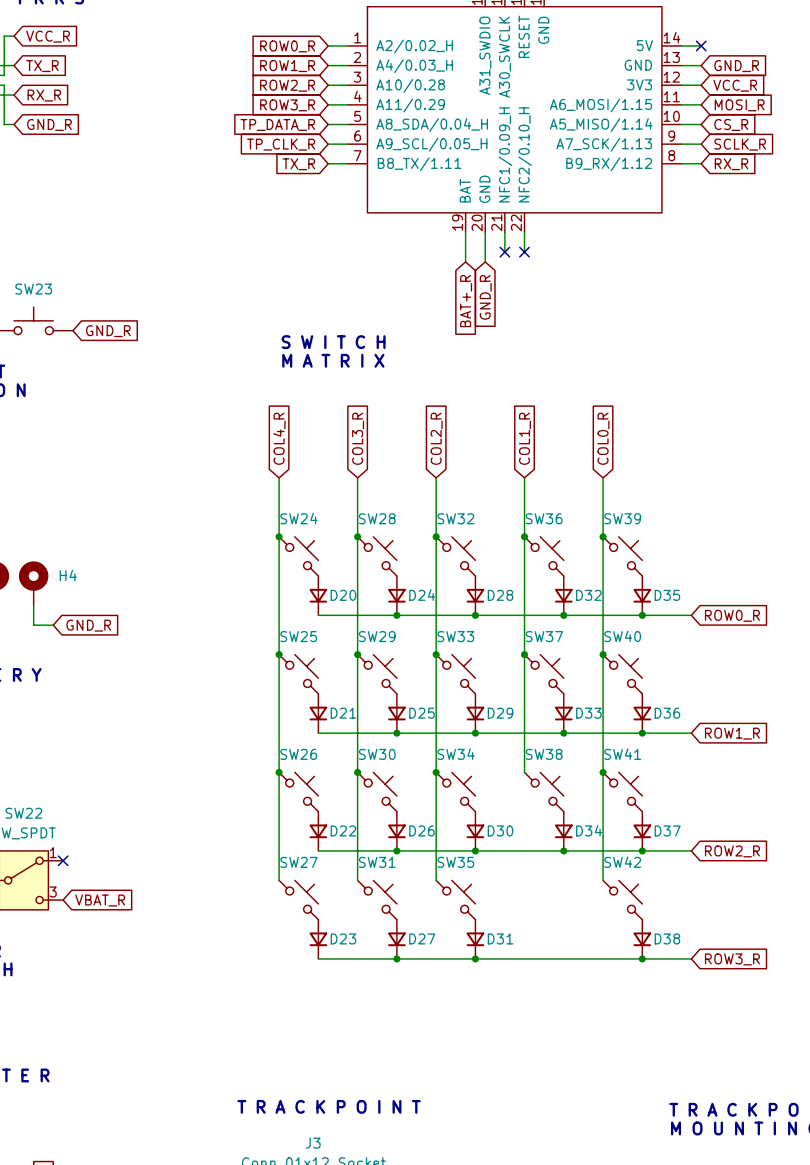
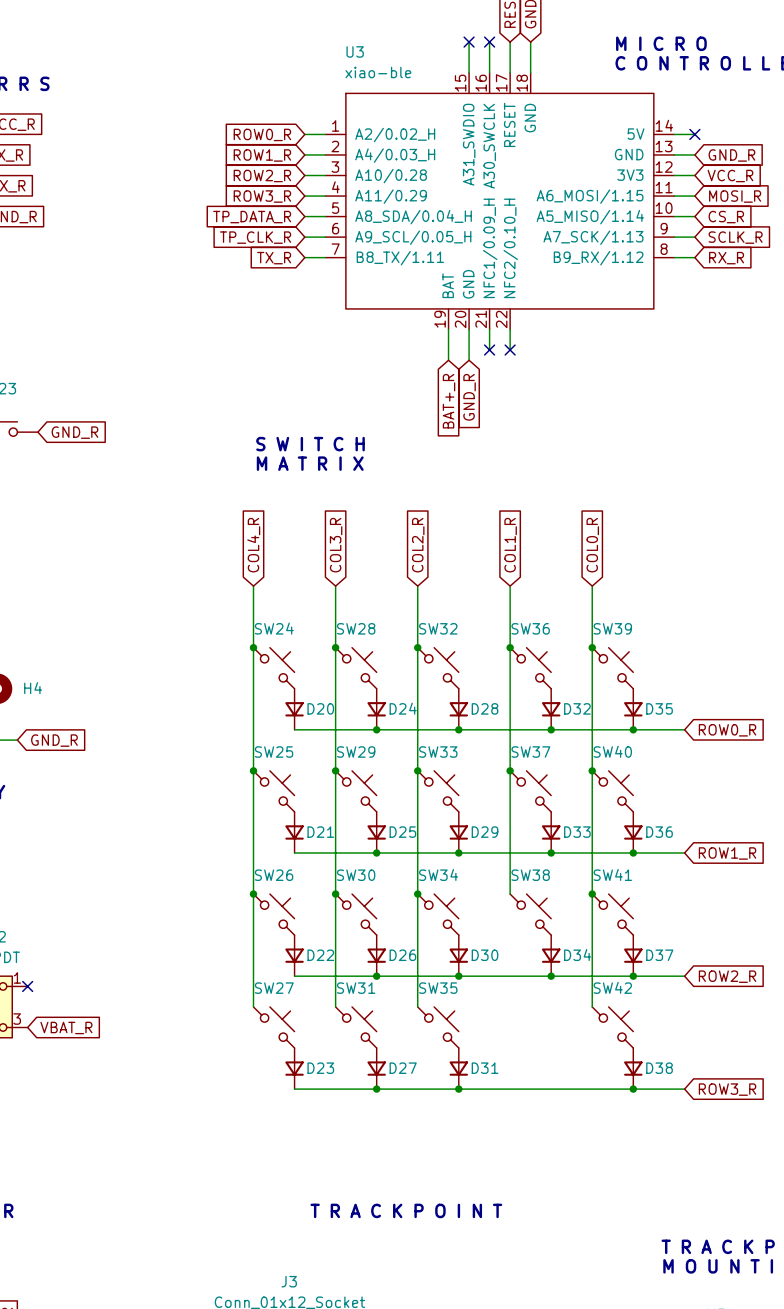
text position: T R A C K P O I N T (329, 1106) -> T R A C K P O I N T (406, 1210)

